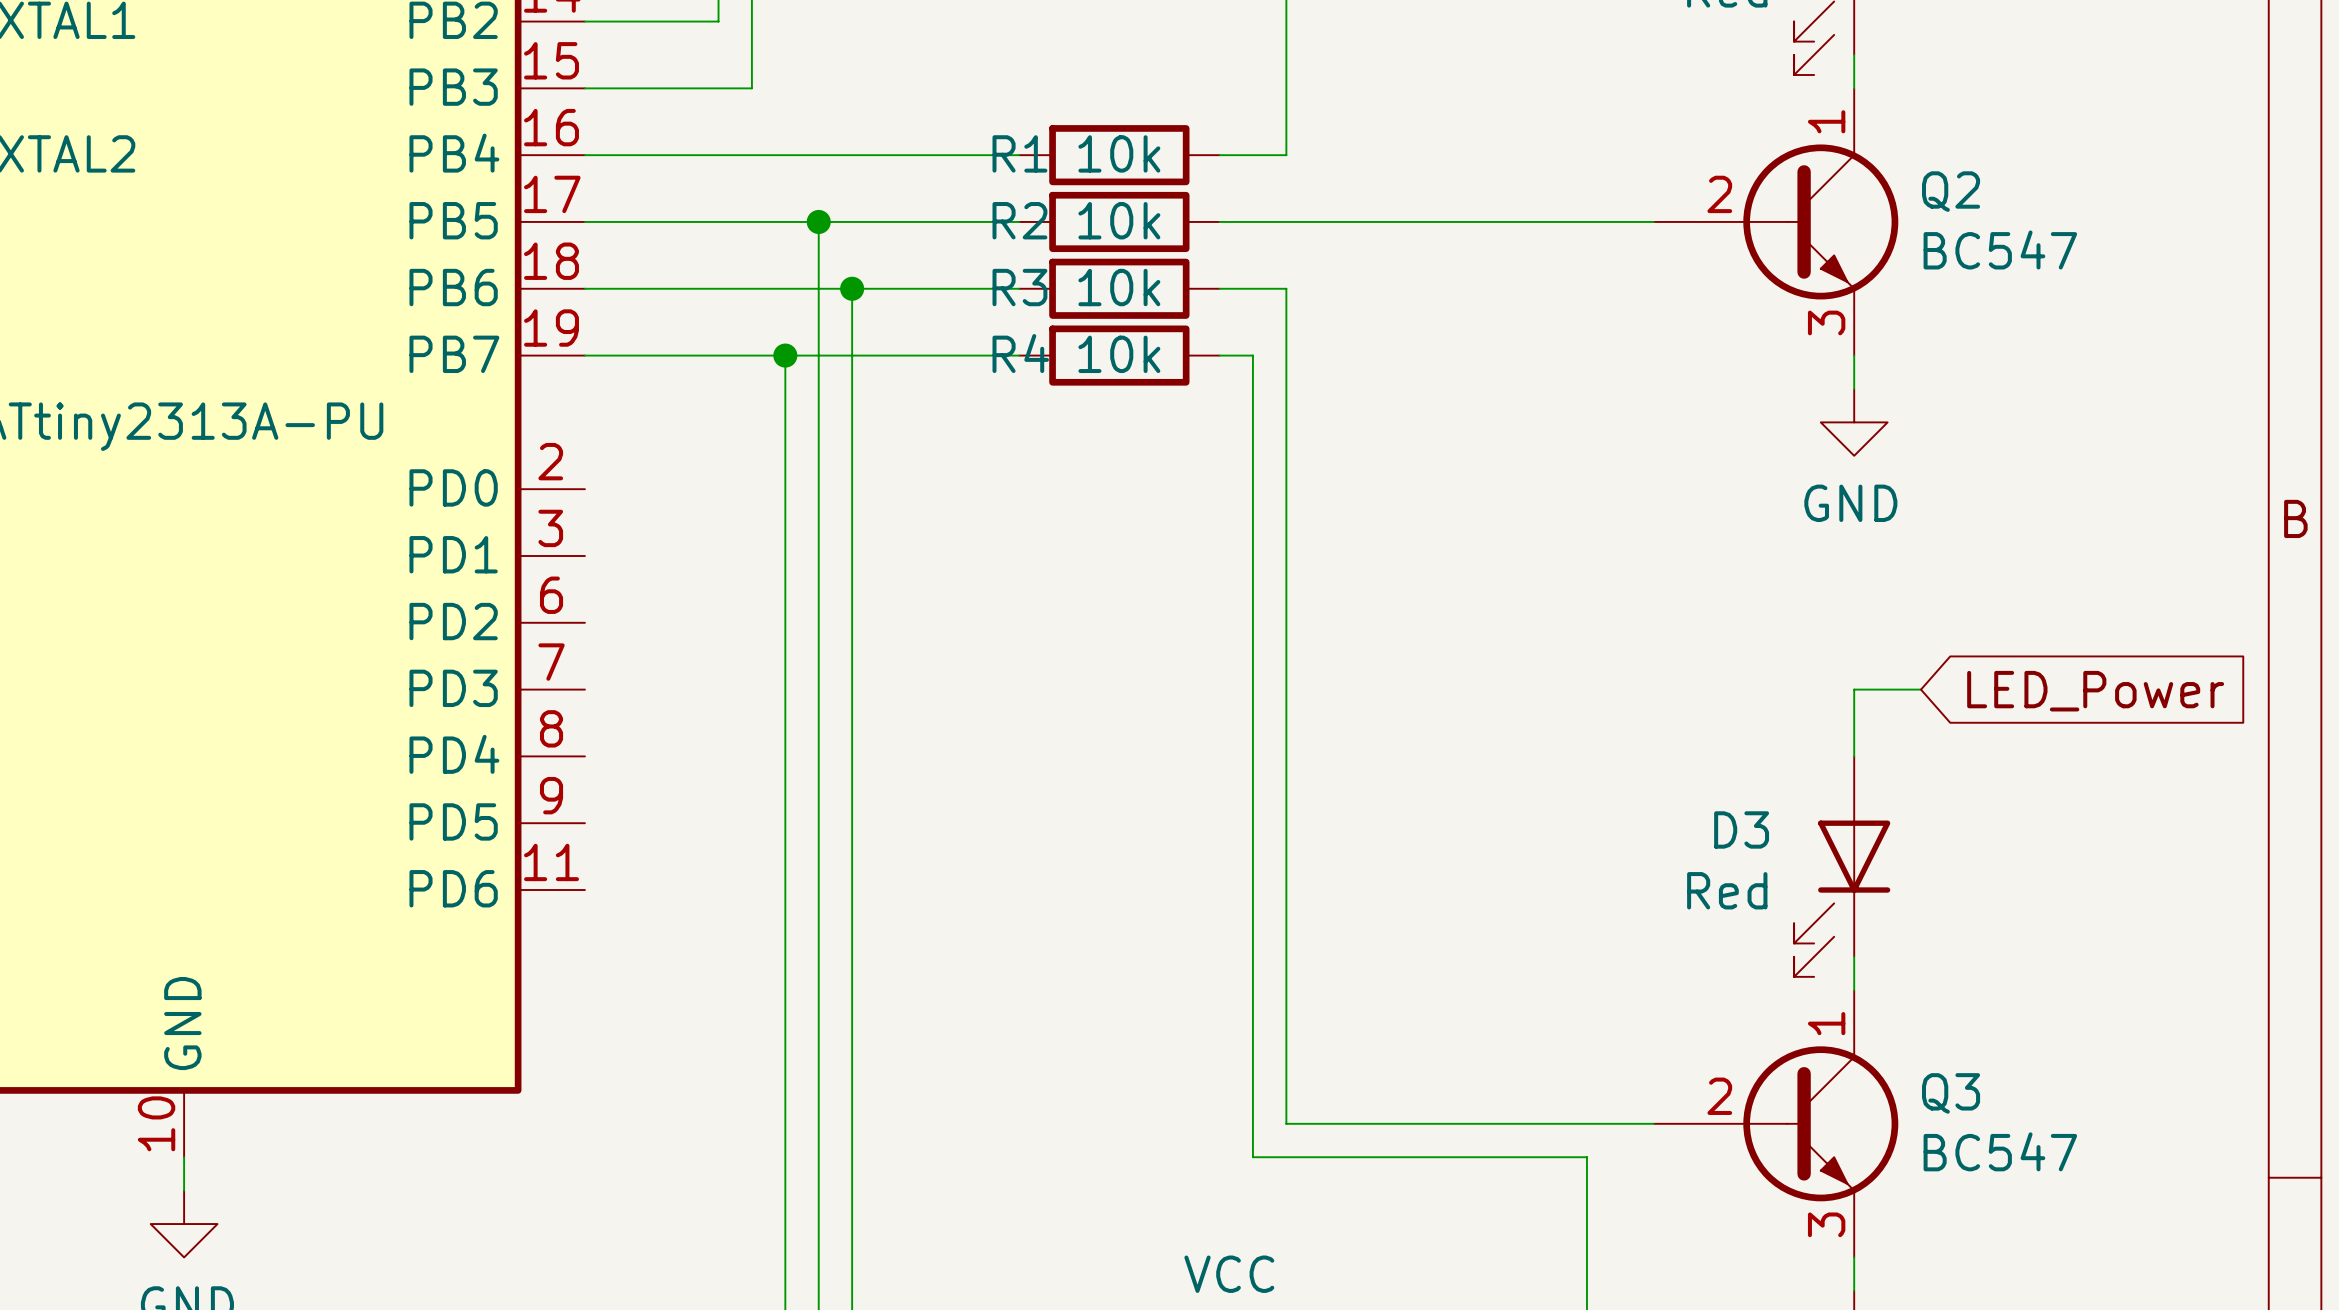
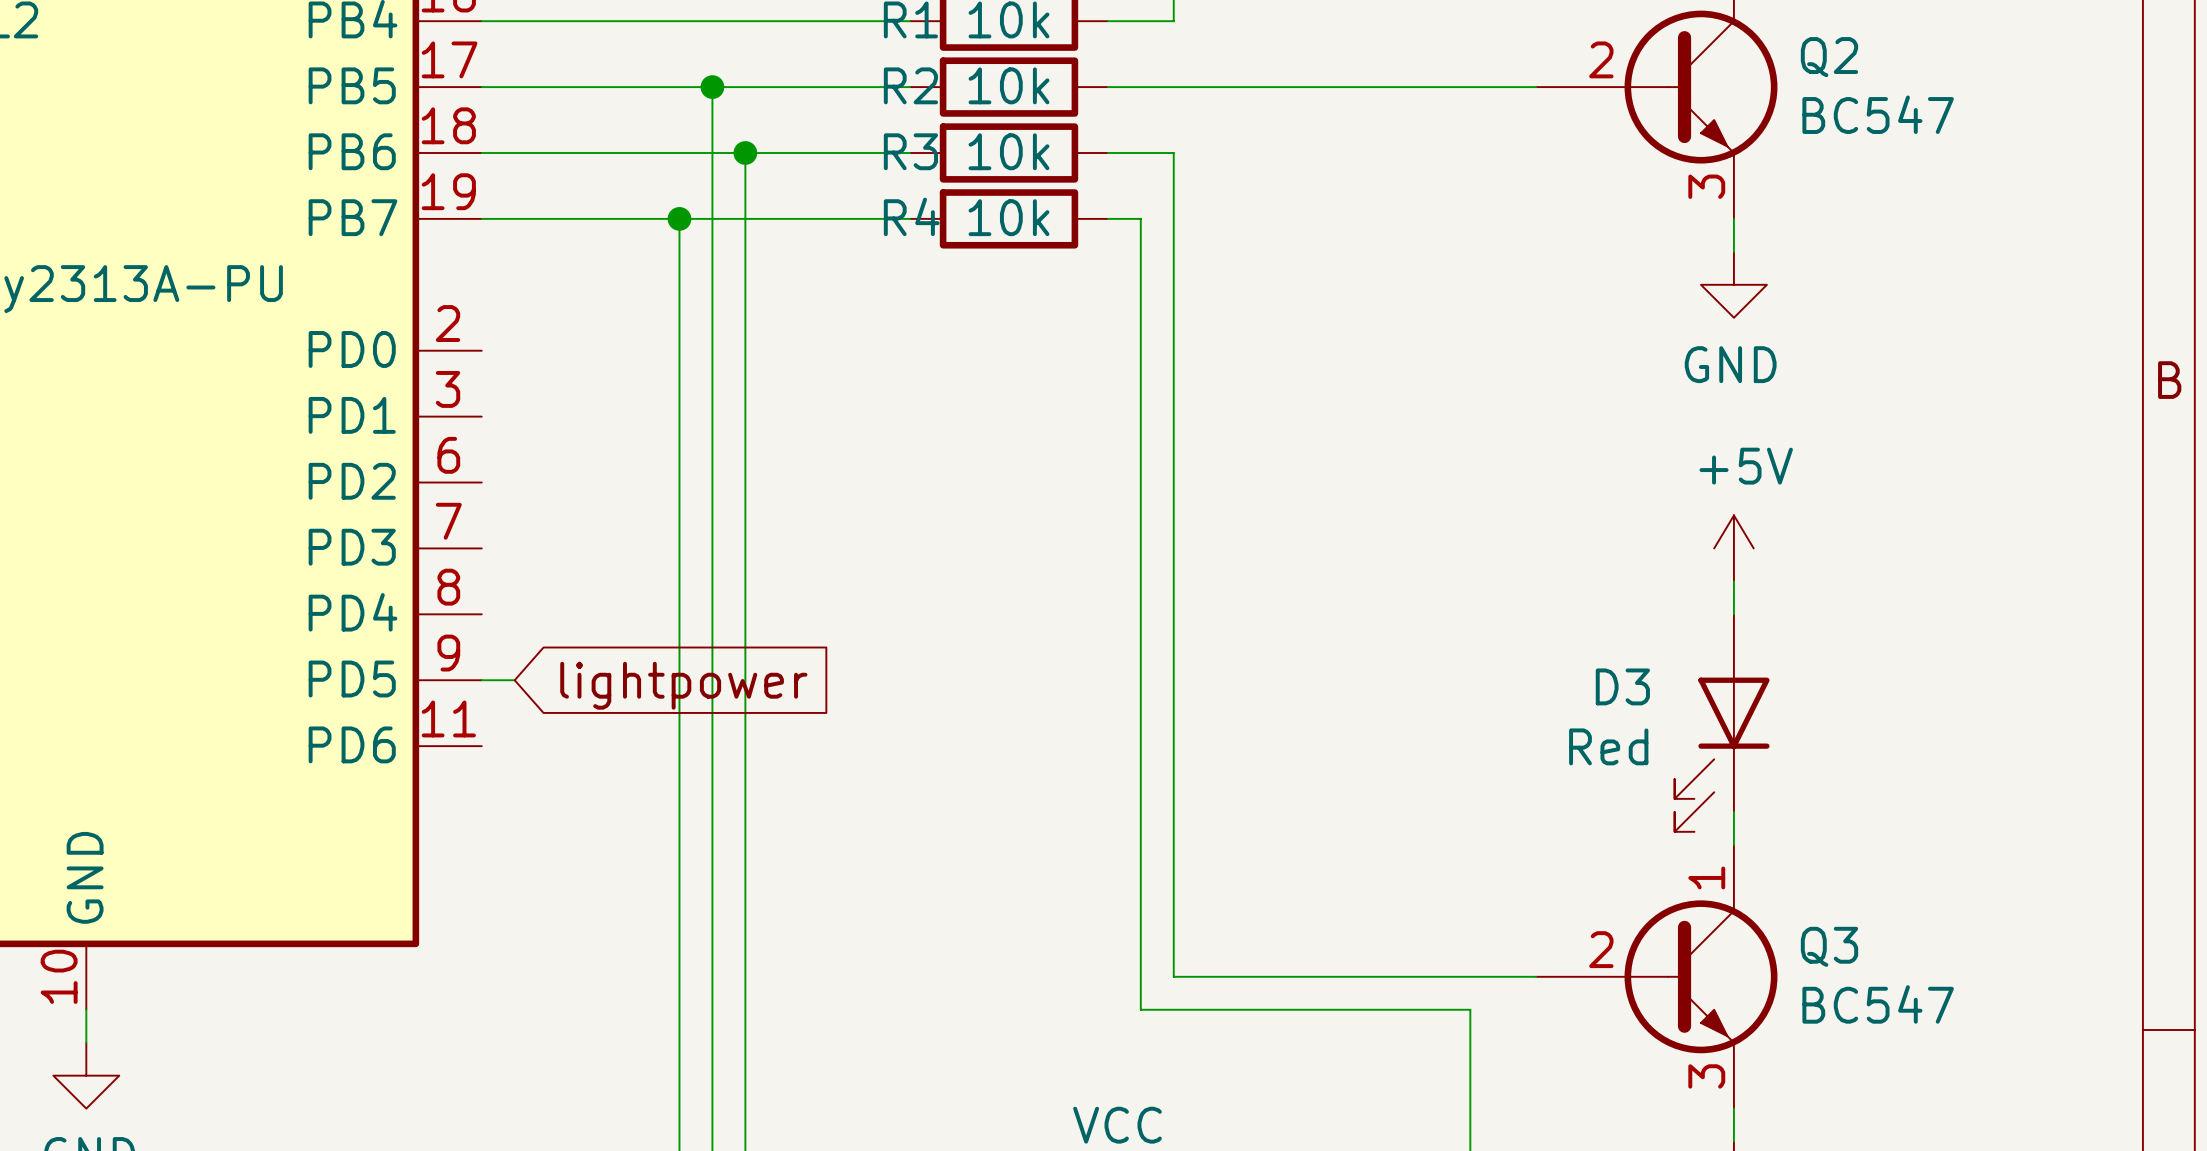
power symbol: none -> +5V (1733, 548)
wire: (1921, 689) (1854, 689) (1854, 723) -> none
global label: LED_Power (2095, 691) -> none
wire: none -> (481, 680) (514, 680)
global label: none -> lightpower (683, 685)

